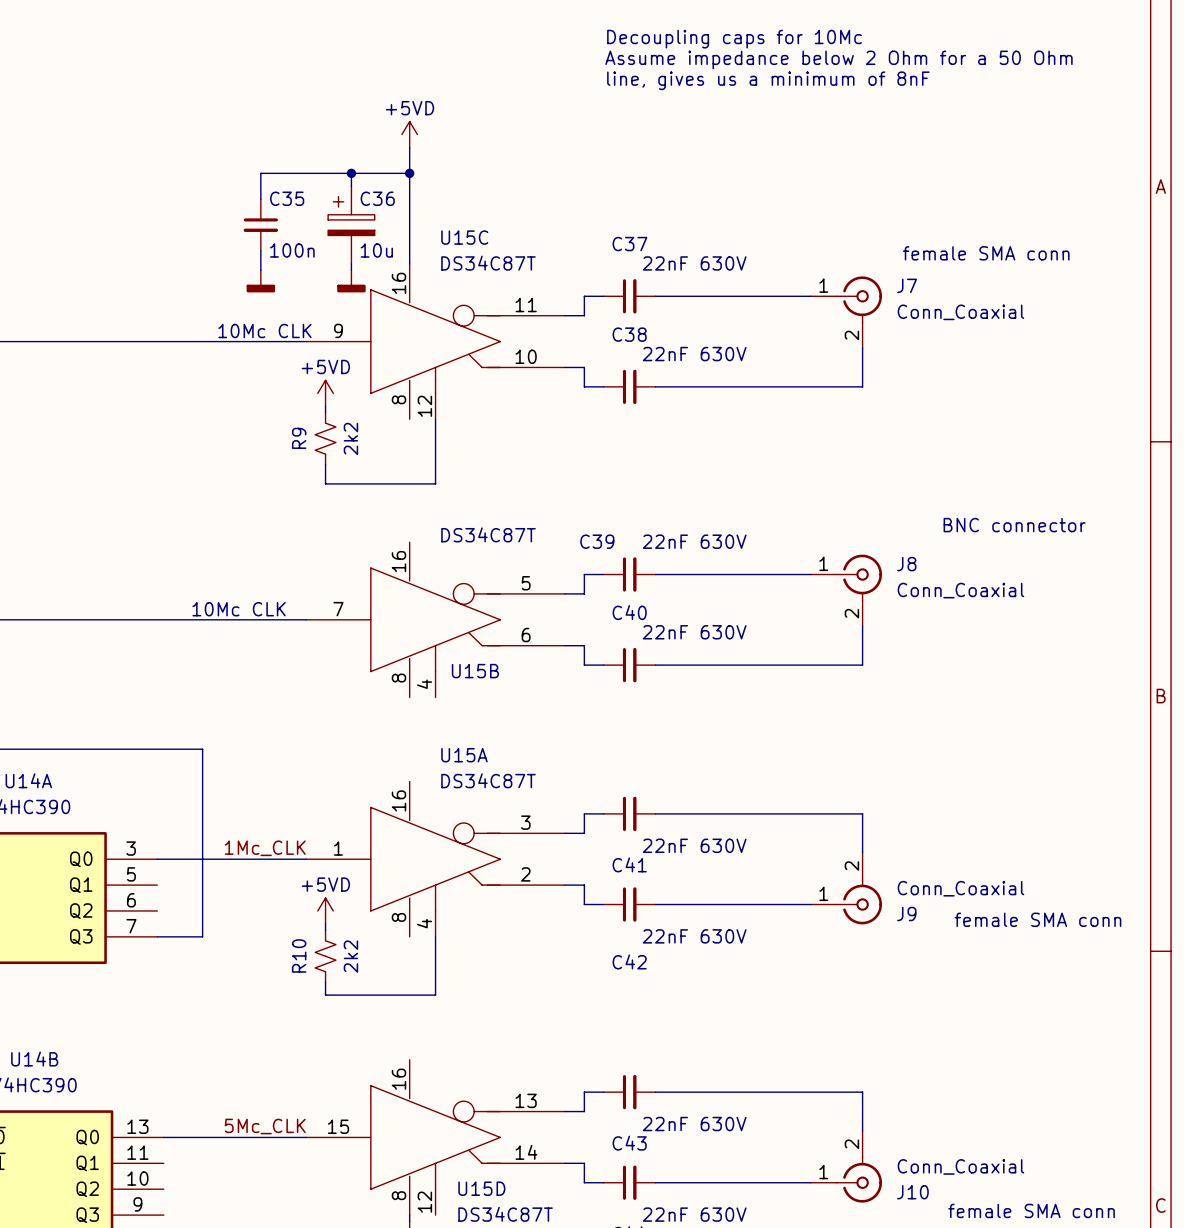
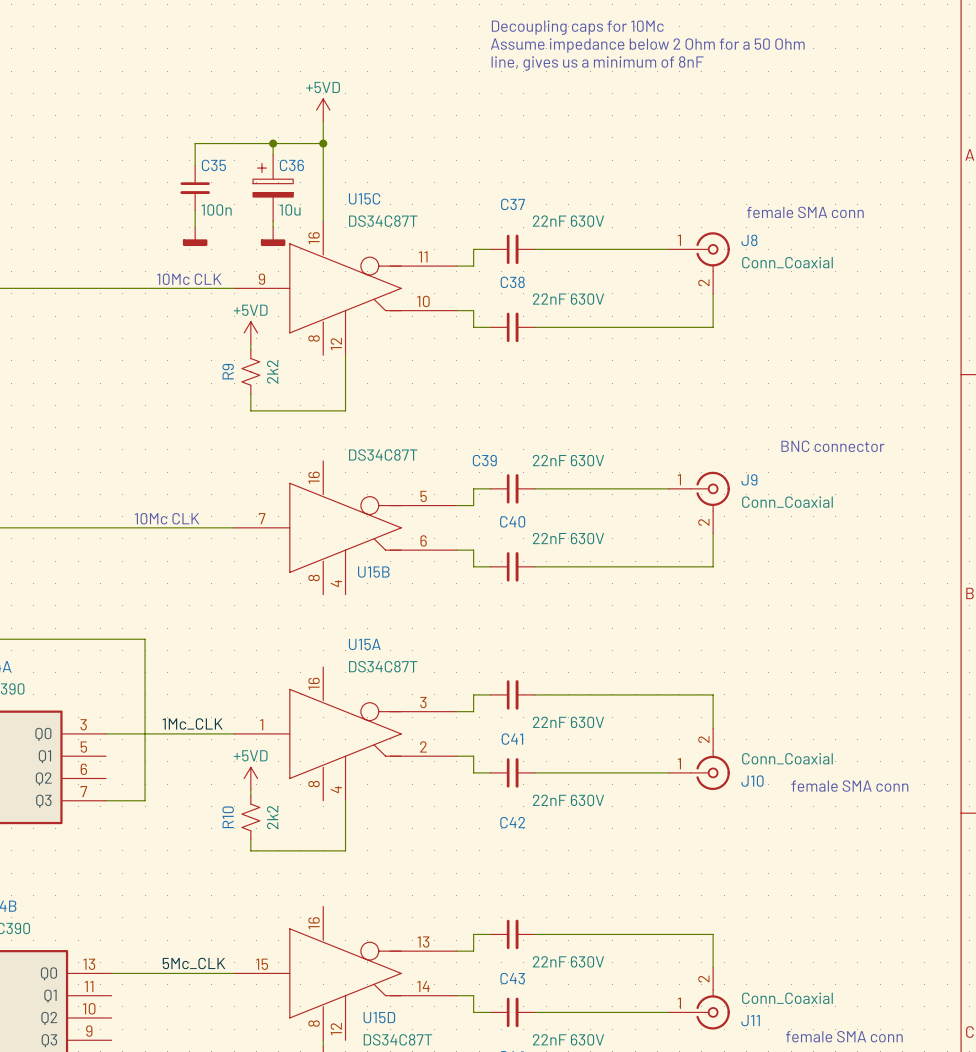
J7 name: J7 (907, 285) -> J8 (749, 240)
J8 name: J8 (906, 564) -> J9 (749, 479)
J9 name: J9 (906, 913) -> J10 (752, 781)
J10 name: J10 (912, 1192) -> J11 (750, 1020)

